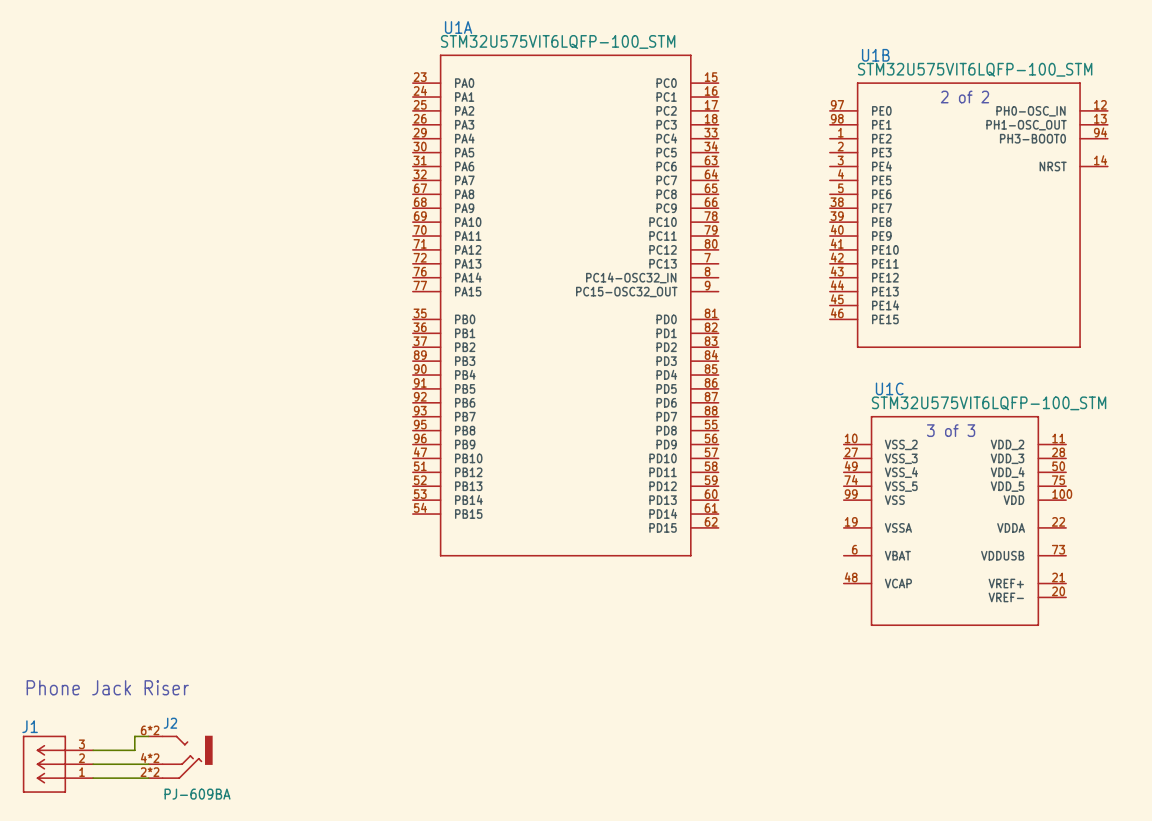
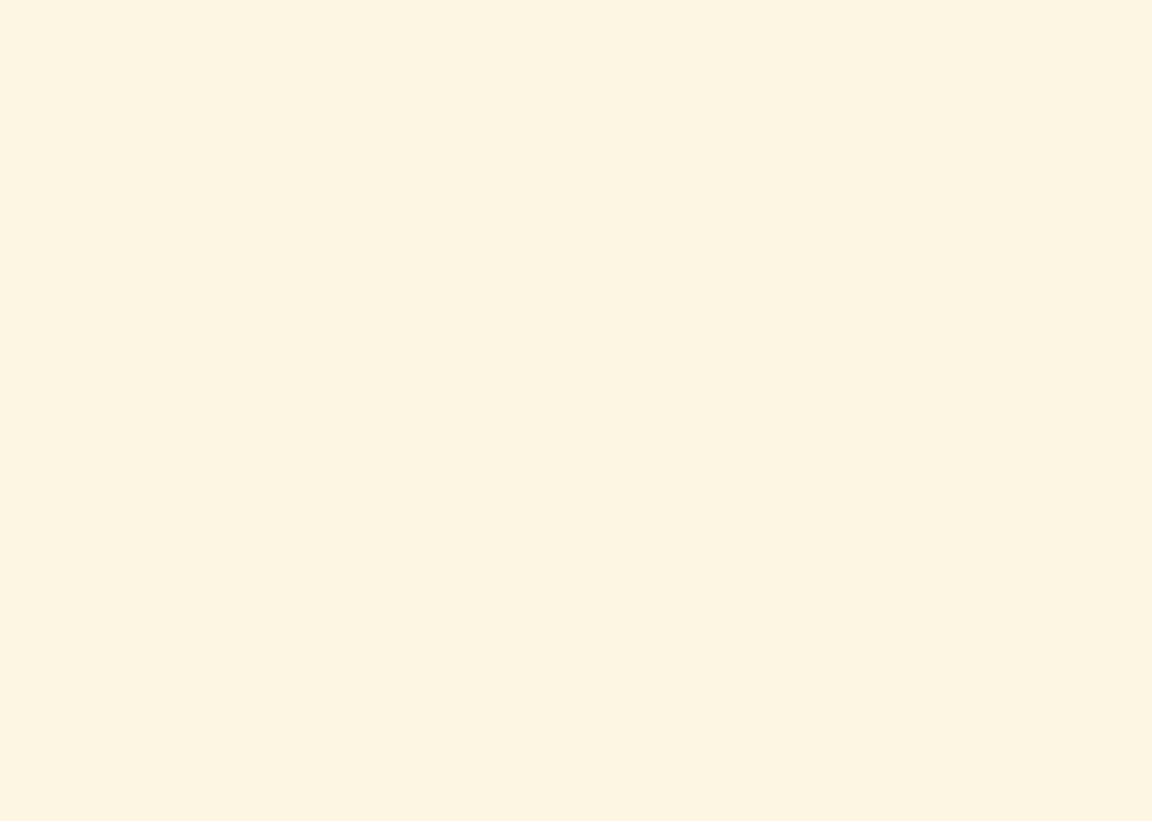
U1B: STM32U575VIT6LQFP-100_STM (968, 215) -> none
U1A: STM32U575VIT6LQFP-100_STM (565, 305) -> none
U1C: STM32U575VIT6LQFP-100_STM (954, 520) -> none
text: Phone Jack Riser (107, 687) -> none
wire: (148, 736) (134, 736) (134, 750) (93, 750) -> none
J2: PJ-609BA (180, 757) -> none
J1: (58, 764) -> none
wire: (93, 764) (148, 764) -> none
wire: (93, 778) (148, 778) -> none

